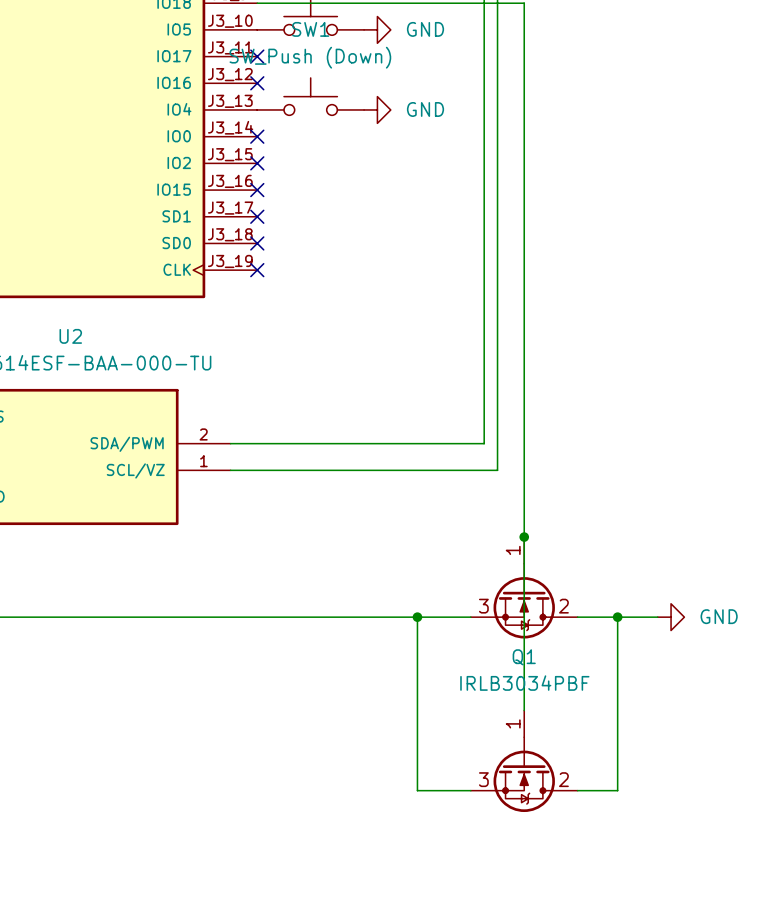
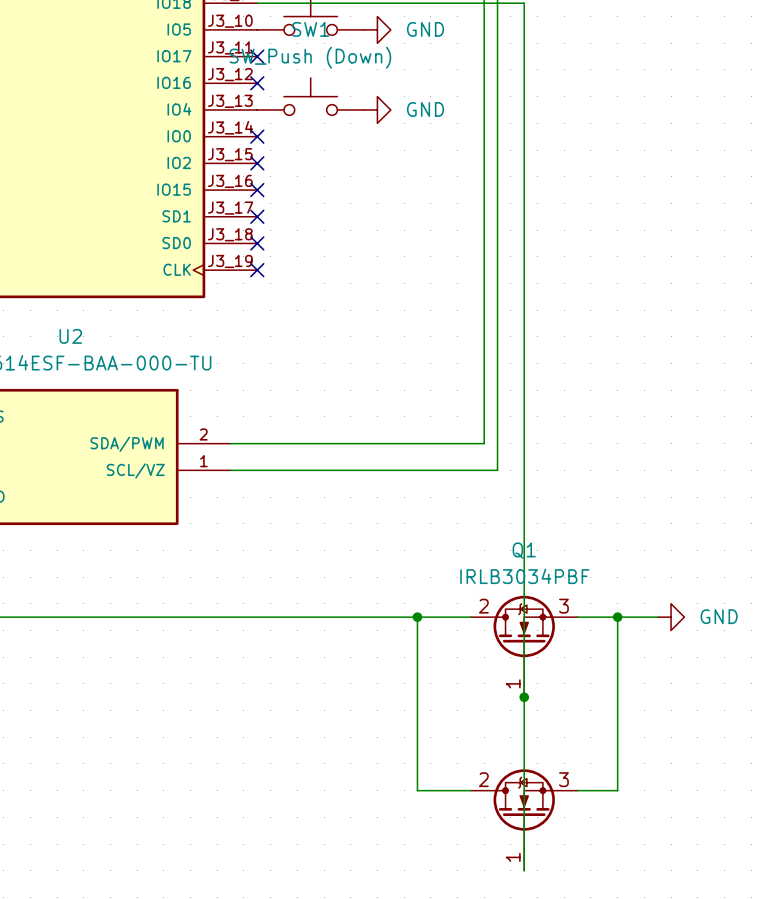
junction: (524, 537) -> none
Q1 rotation: 0° (524, 601) -> 180° (524, 633)
Q1 name position: Q1 (524, 657) -> Q1 (524, 550)
Q1 value position: IRLB3034PBF (524, 683) -> IRLB3034PBF (524, 576)
junction: none -> (524, 697)
part rotation: 0° (524, 774) -> 180° (524, 806)

